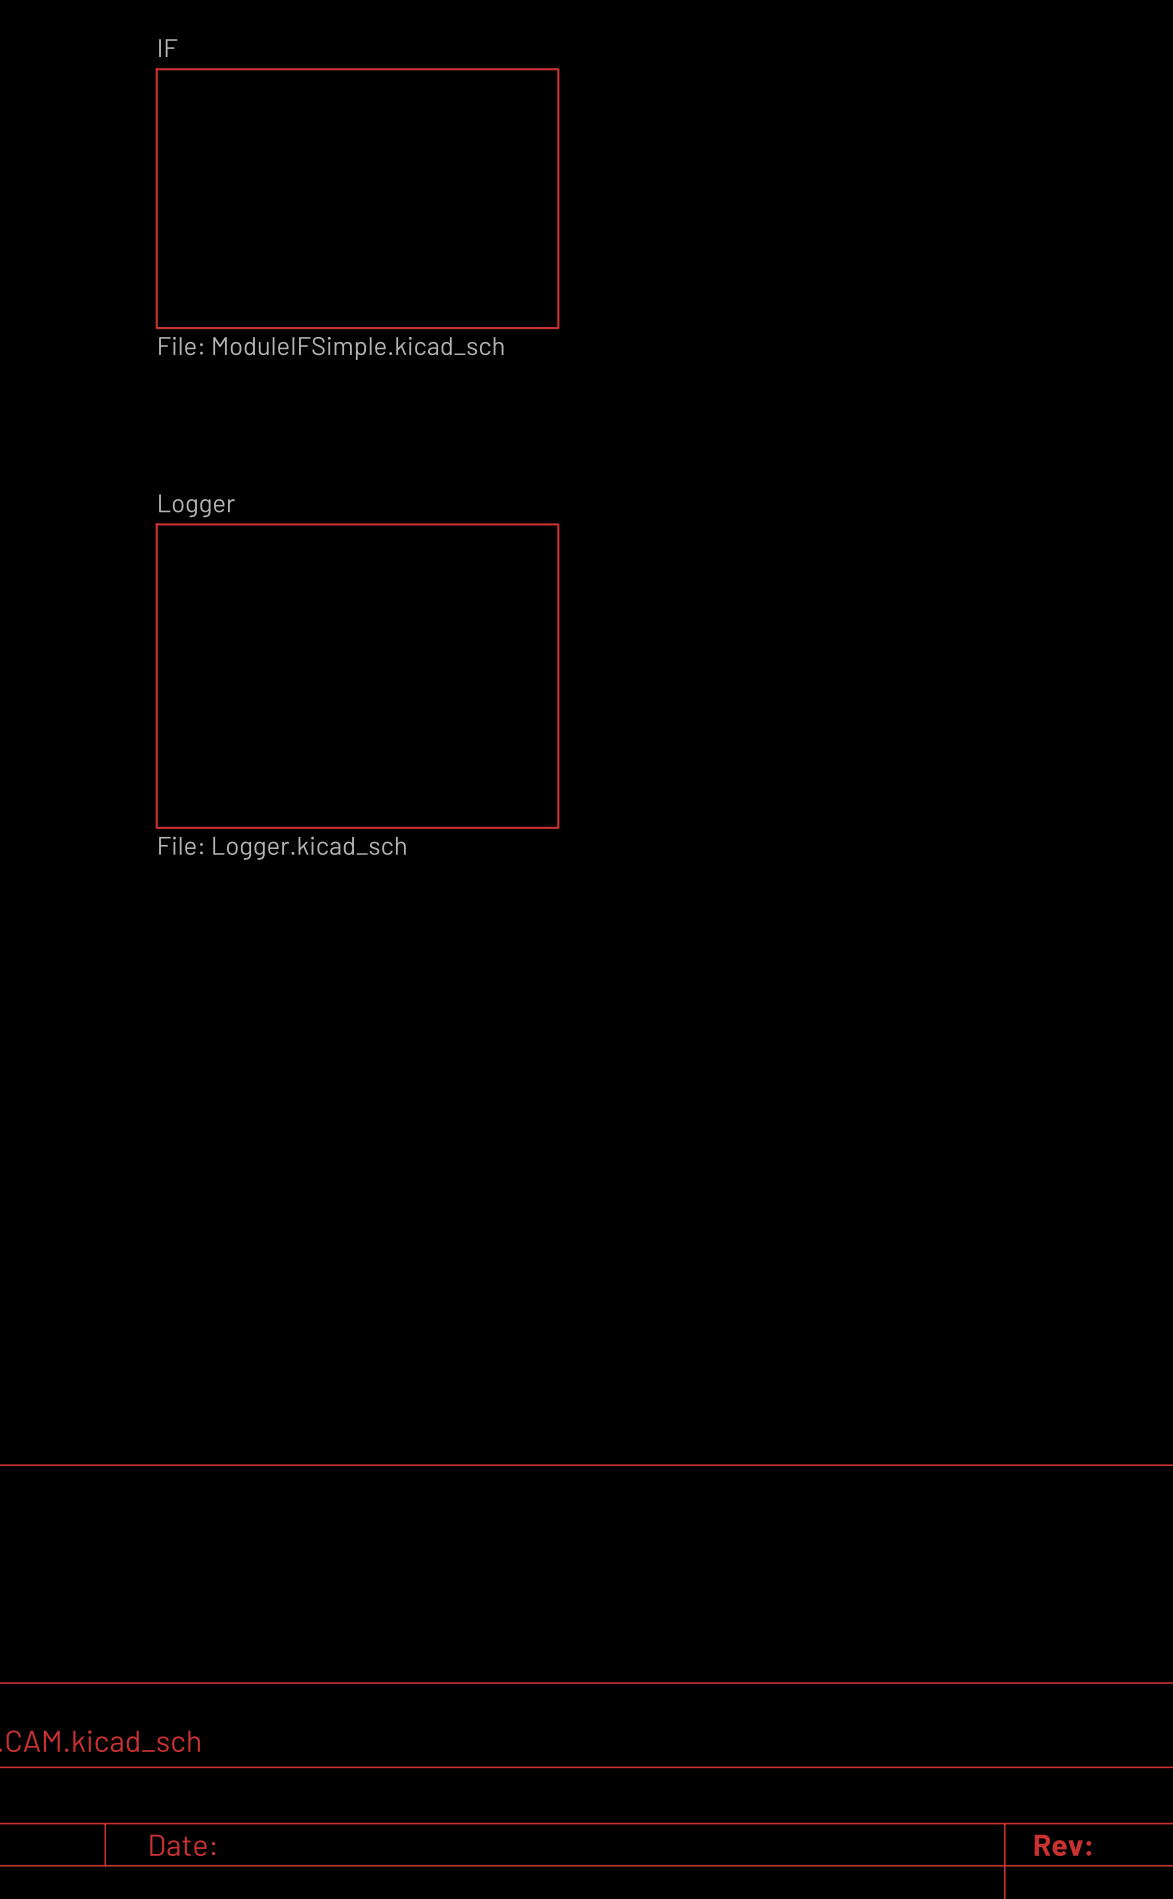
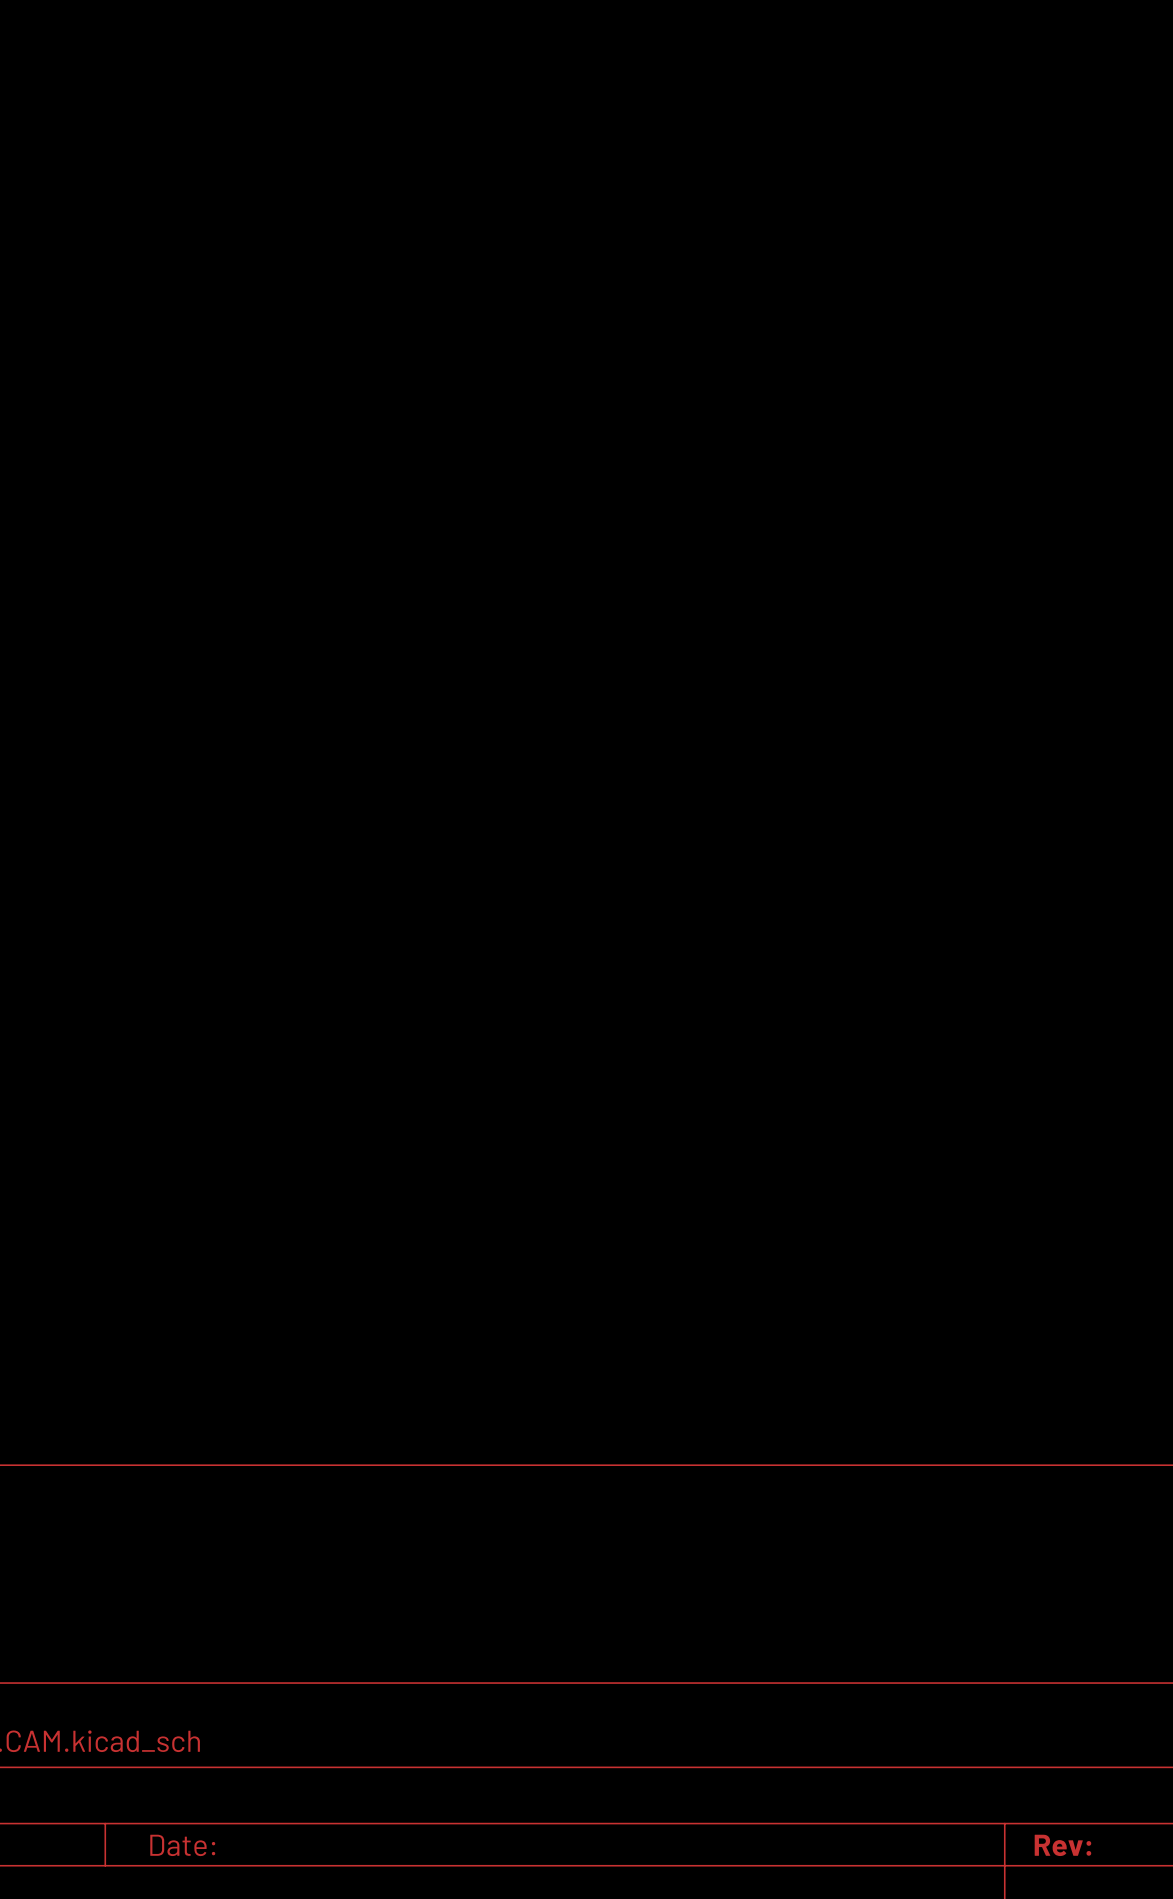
sheet IF: File: ModuleIFSimple.kicad_sch (357, 198) -> none
sheet Logger: File: Logger.kicad_sch (357, 676) -> none

